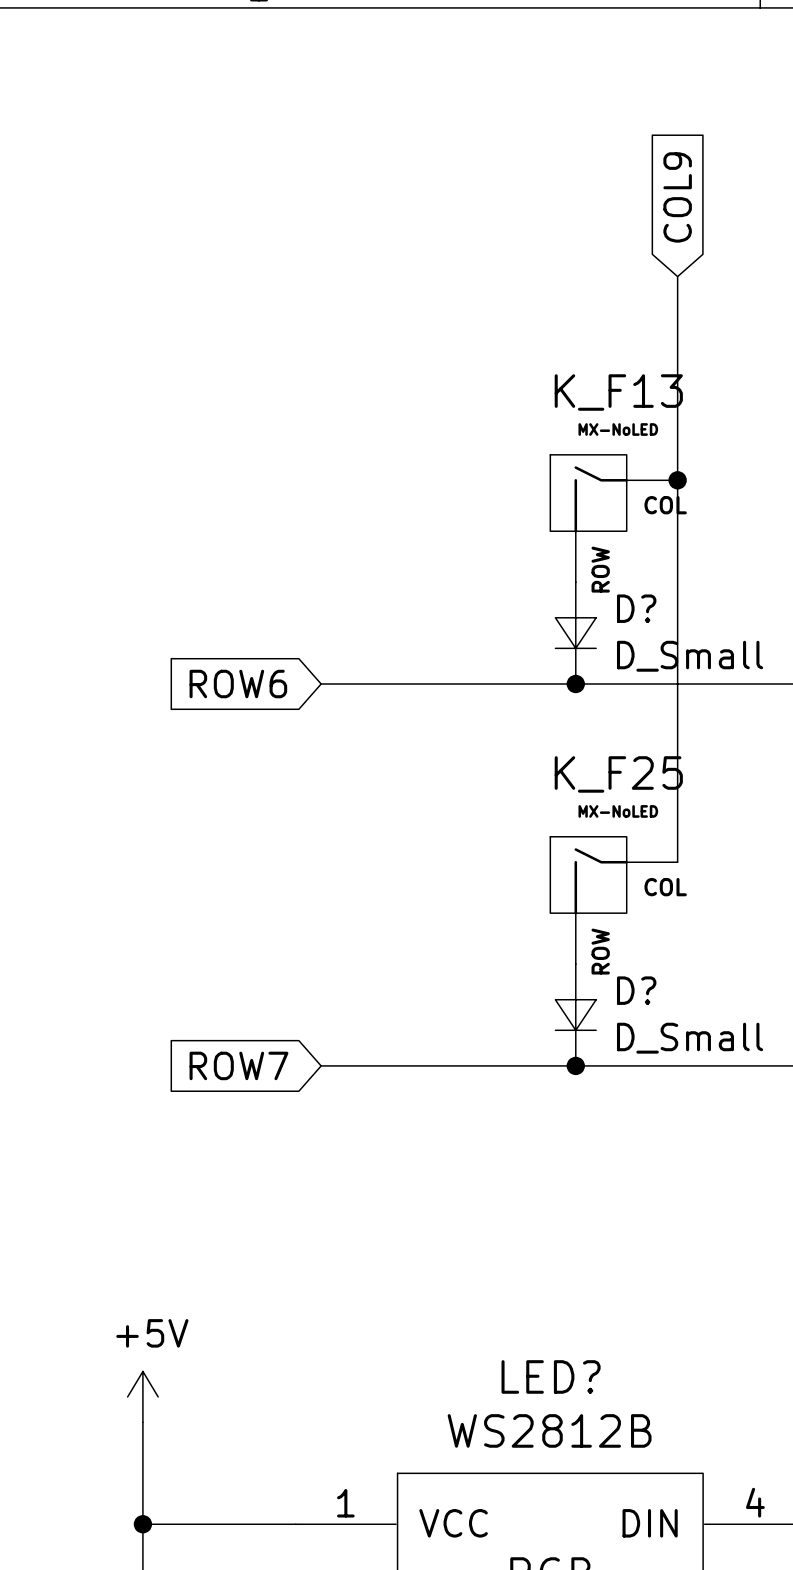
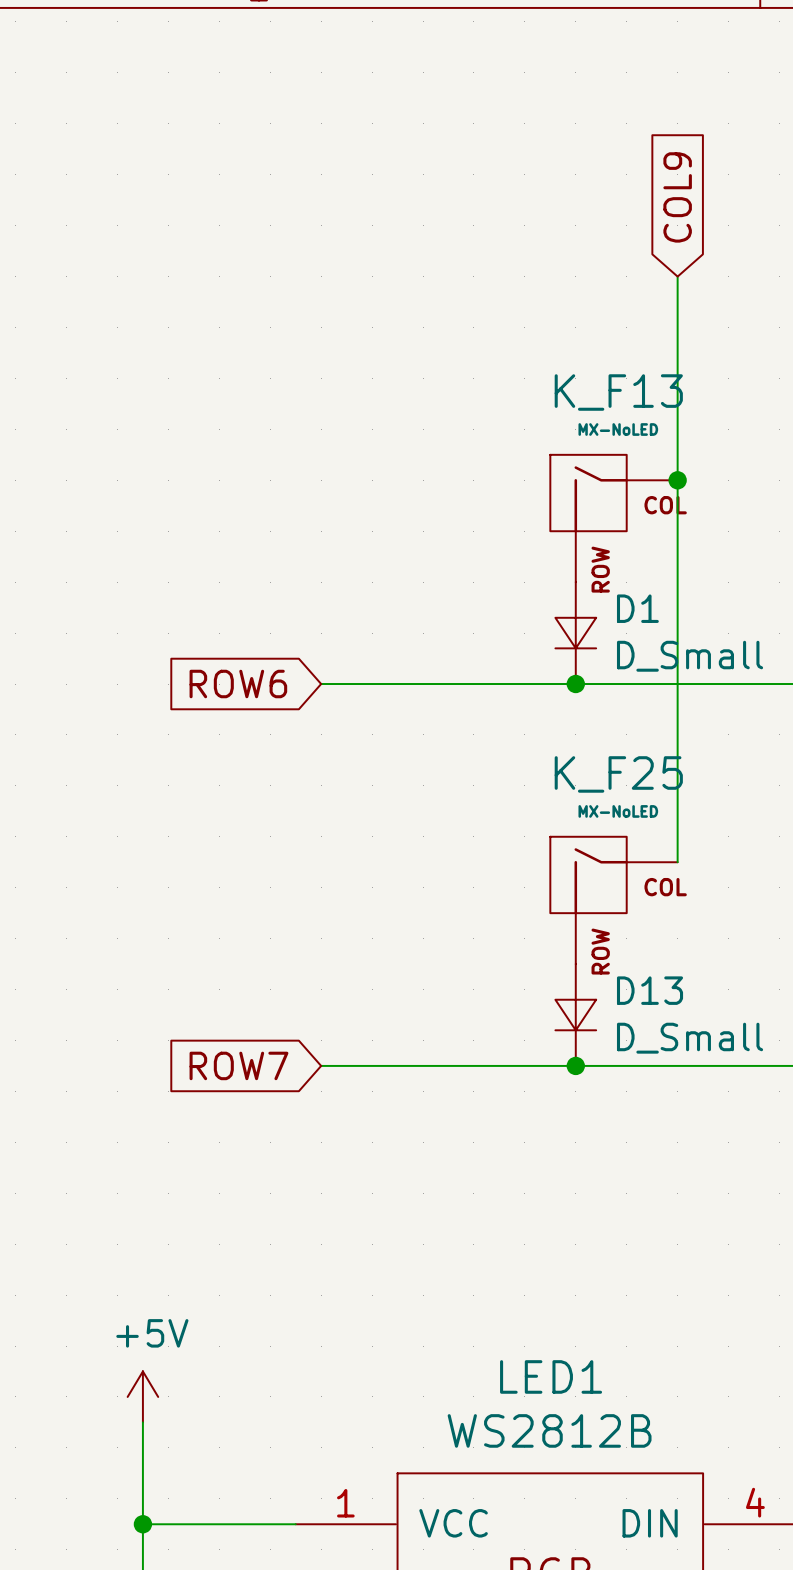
D? name: D? (636, 608) -> D1 (637, 608)
D? name: D? (636, 990) -> D13 (650, 990)
LED? name: LED? (551, 1376) -> LED1 (551, 1376)

